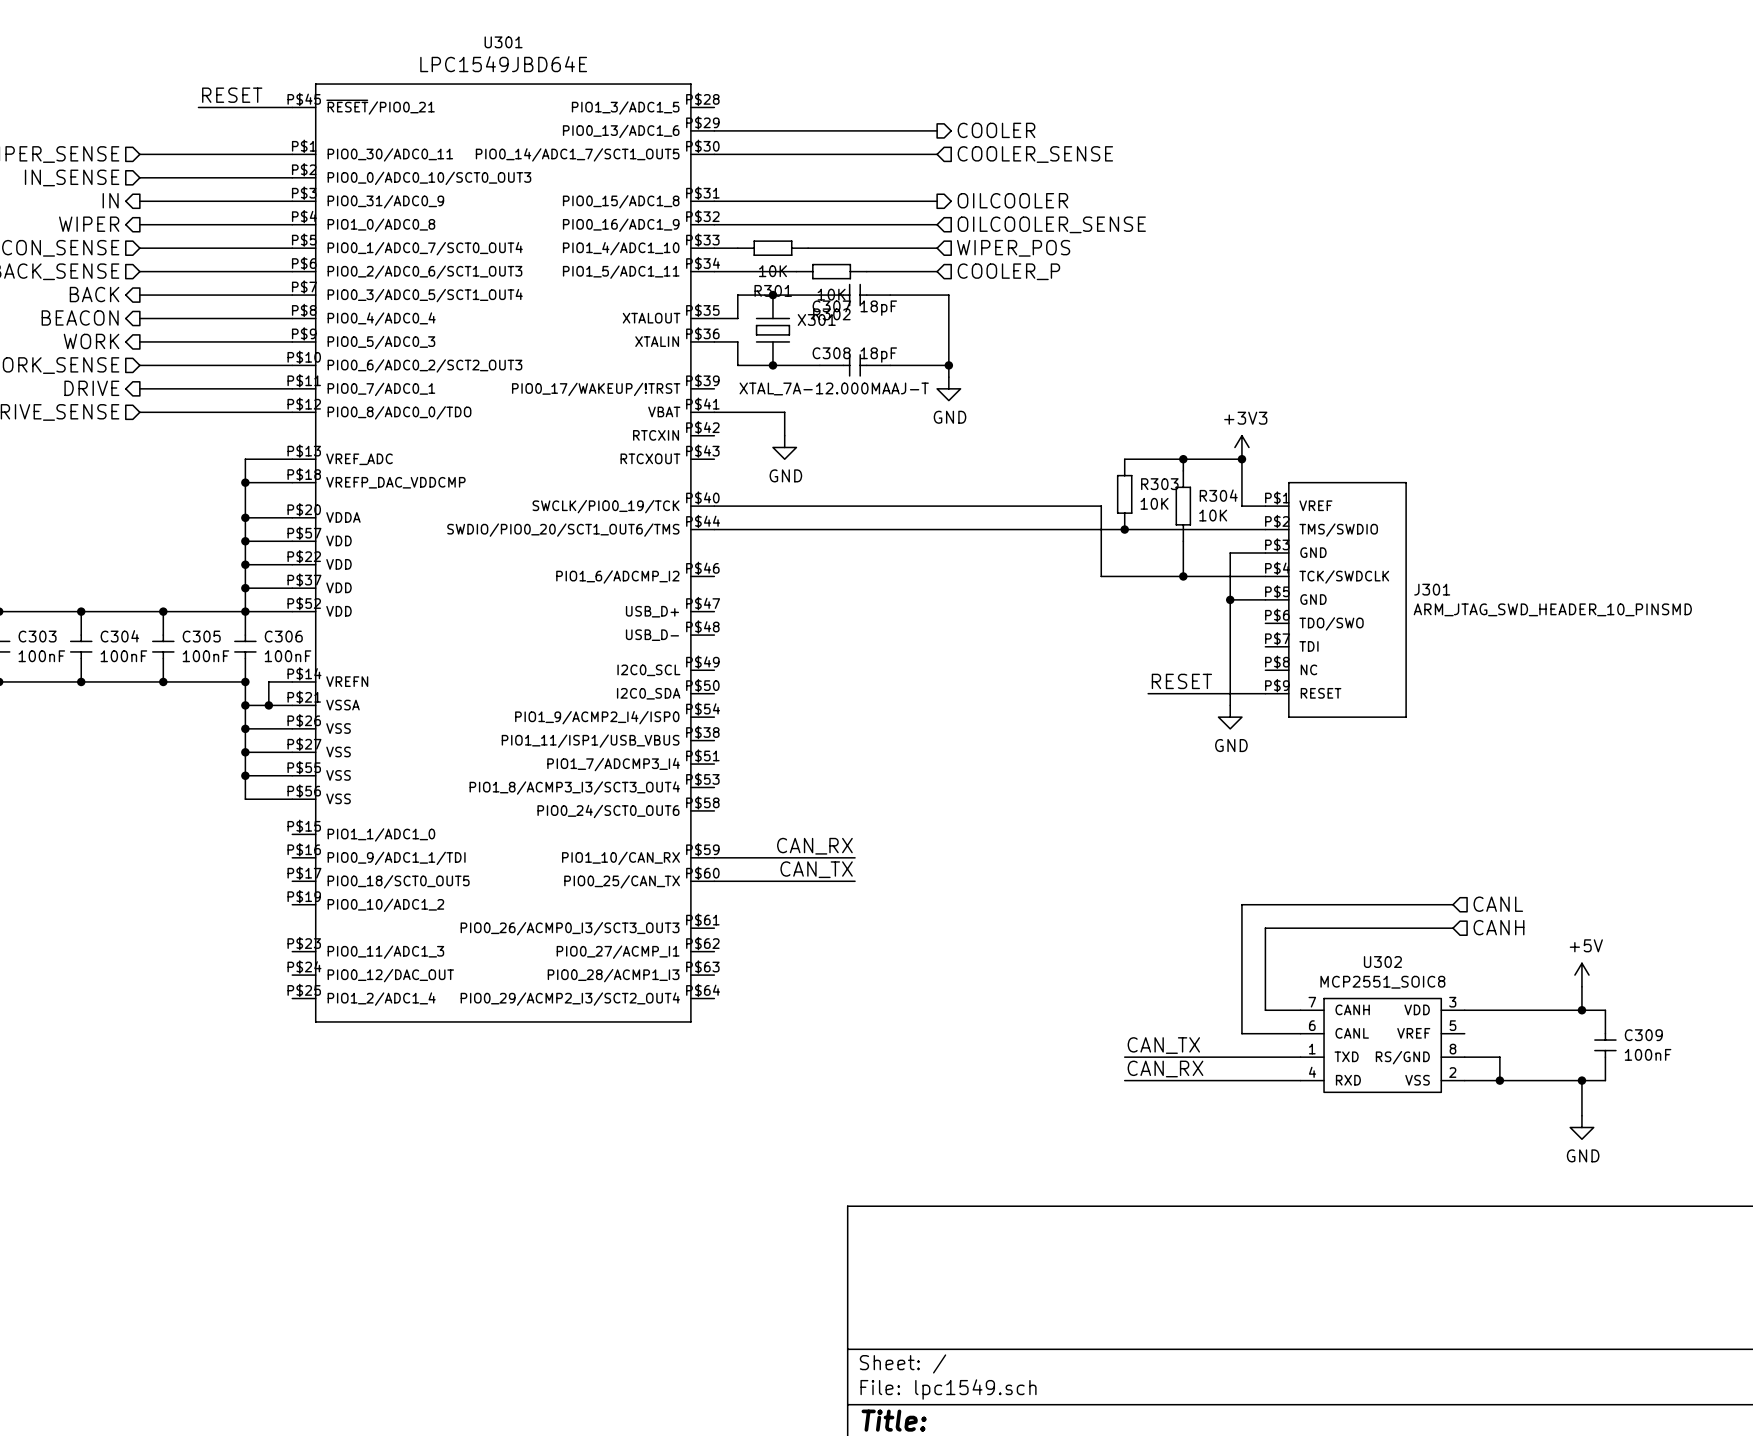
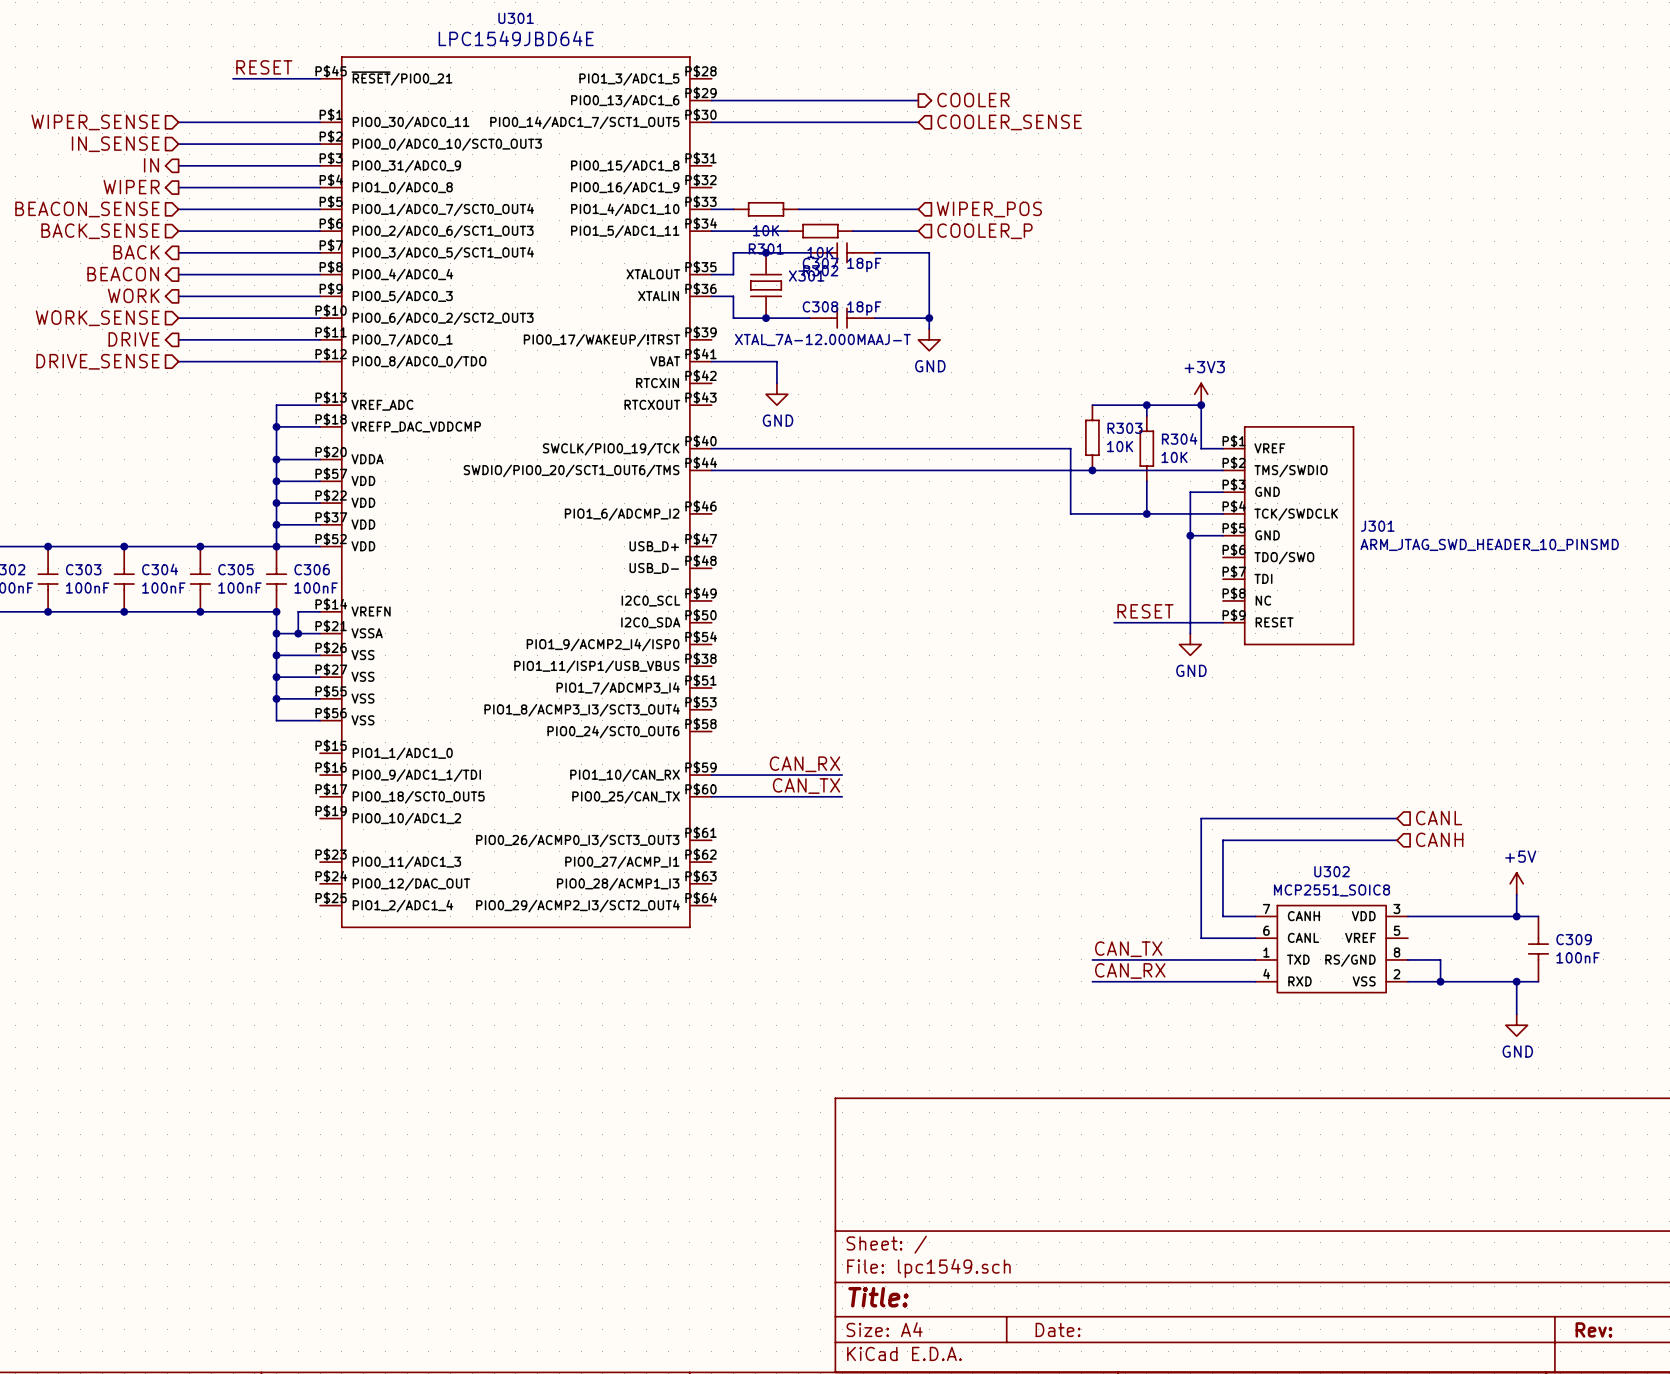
hierarchical label: OILCOOLER (1012, 200) -> none
wire: (714, 201) (937, 201) -> none
wire: (714, 224) (937, 224) -> none
hierarchical label: OILCOOLER_SENSE (1051, 224) -> none

